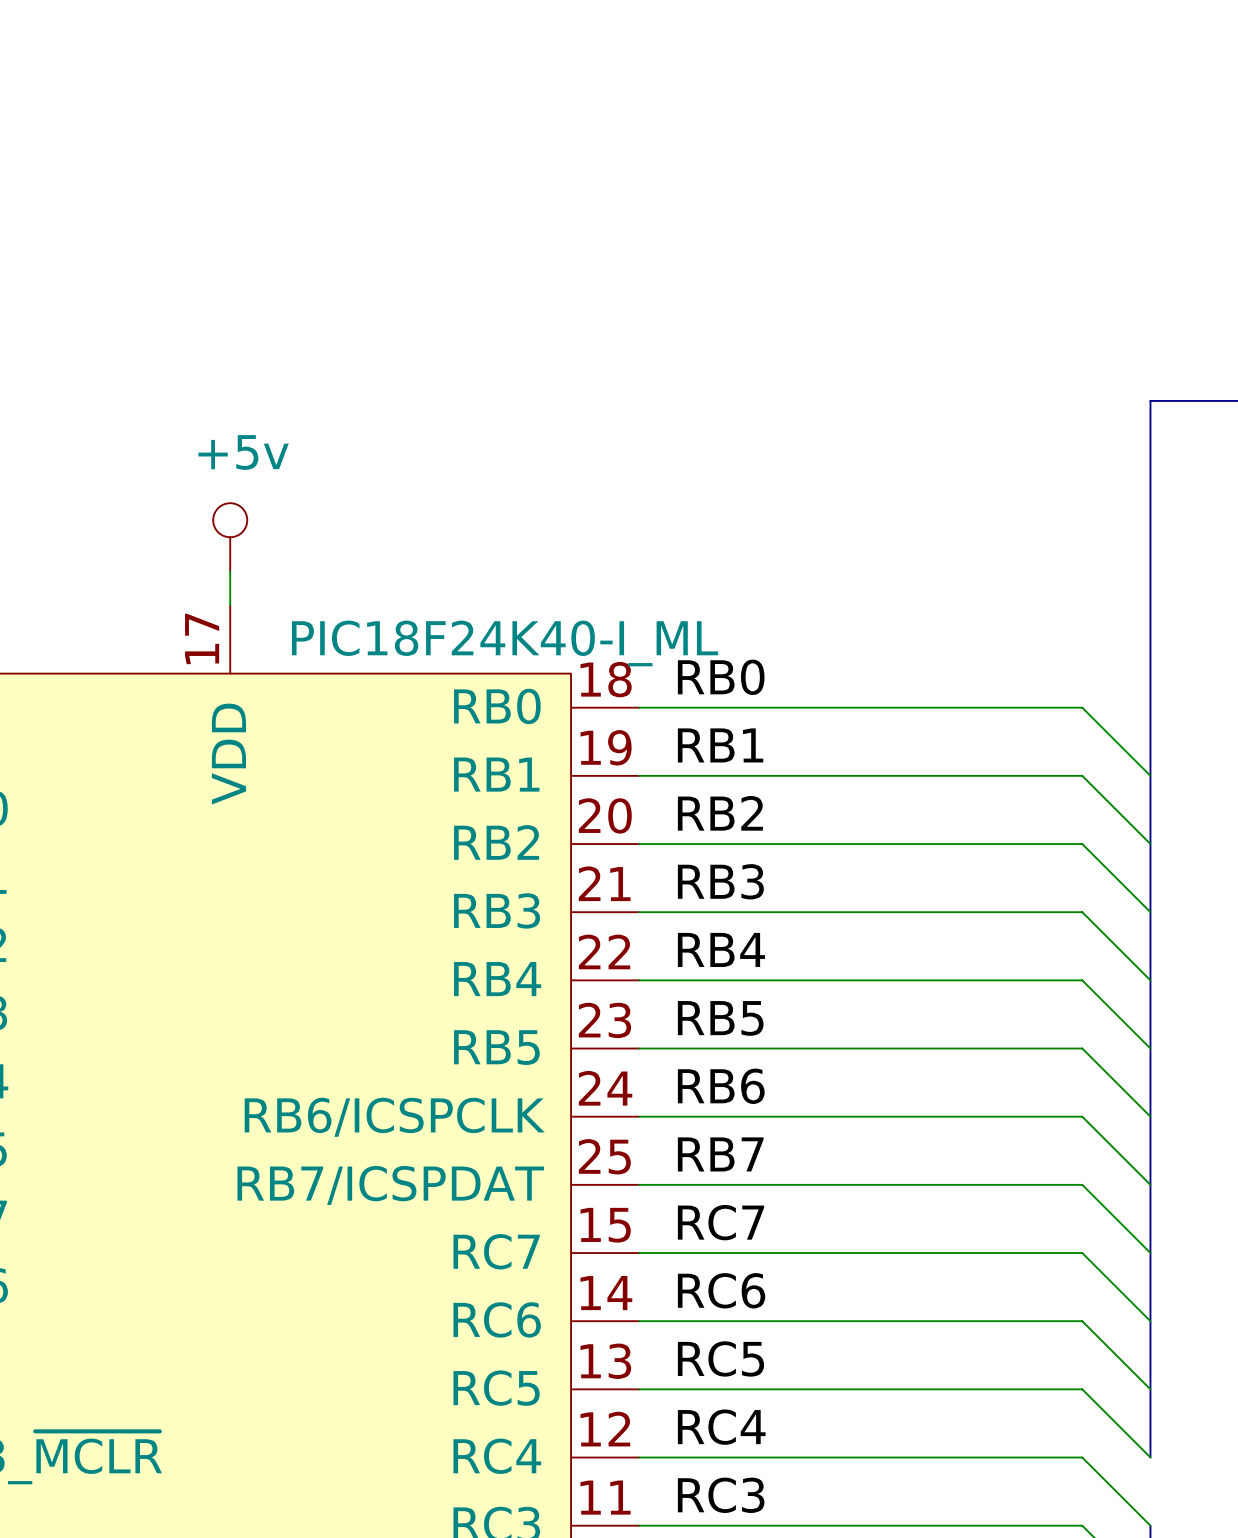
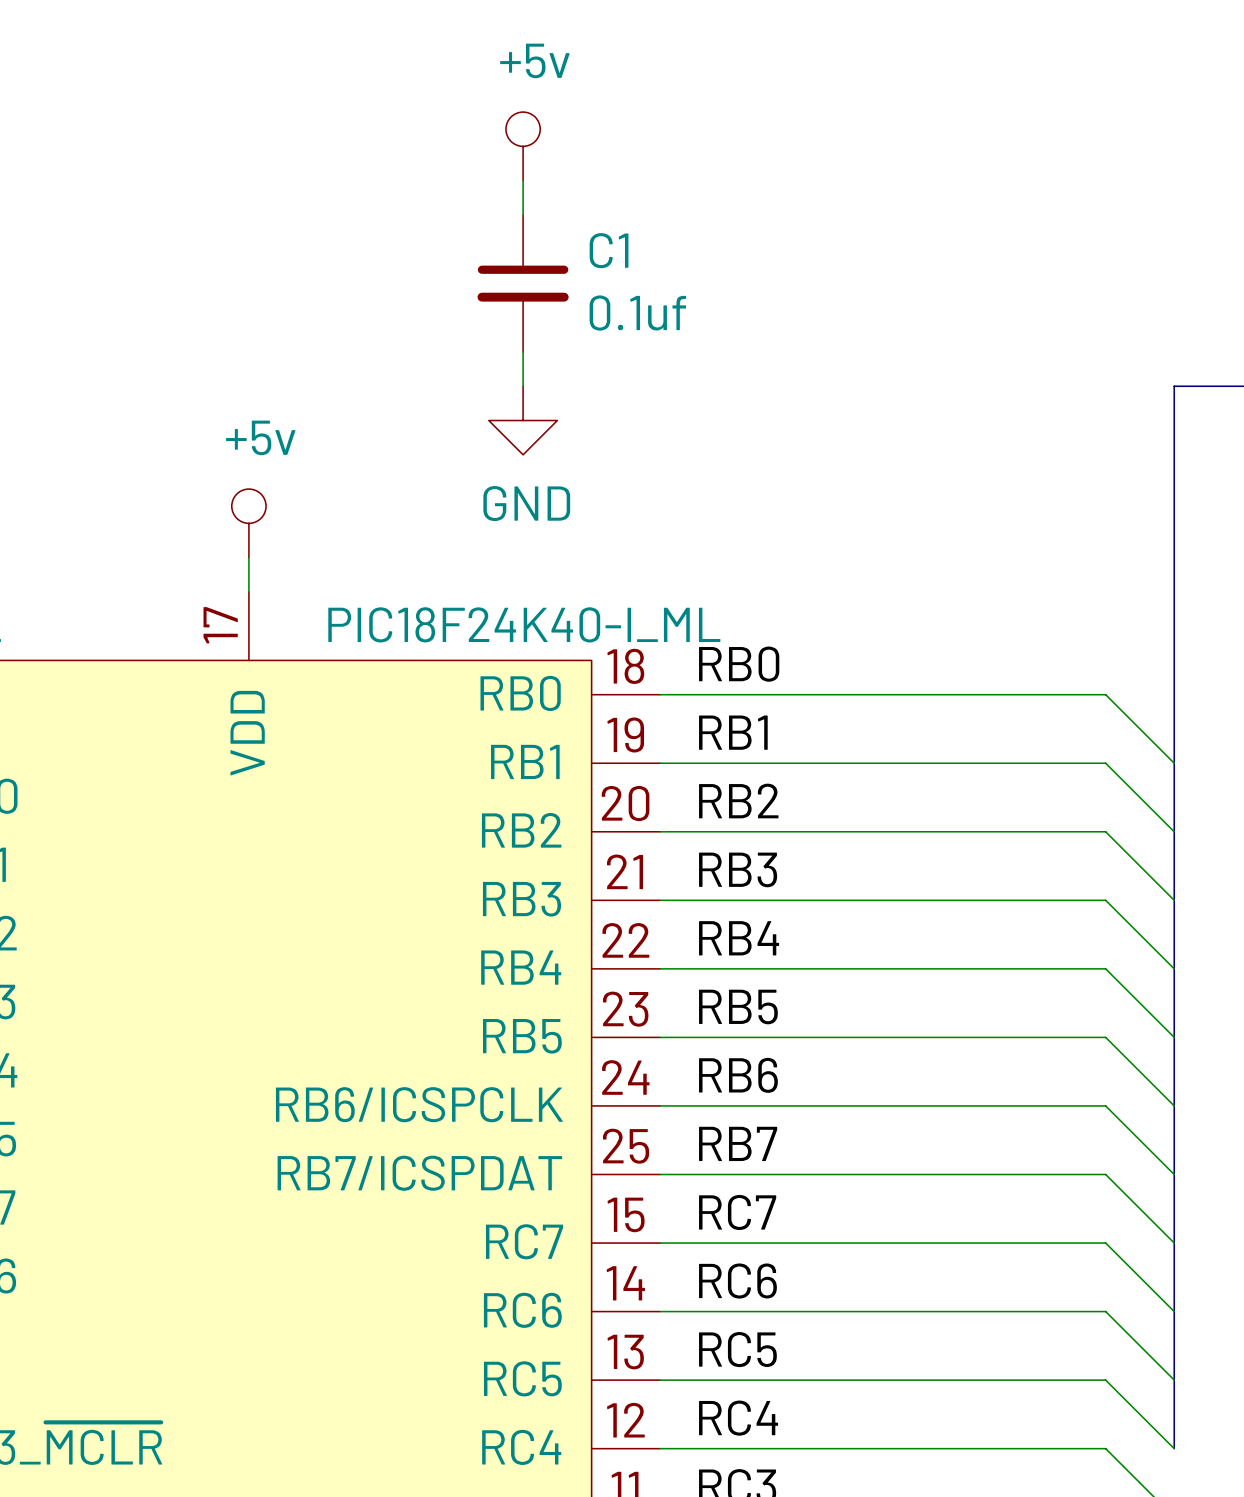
power symbol: none -> +5v (523, 146)
wire: none -> (523, 180) (523, 214)
C1: none -> 0.1uf (523, 283)
wire: none -> (523, 351) (523, 386)
power symbol: none -> GND (523, 420)

